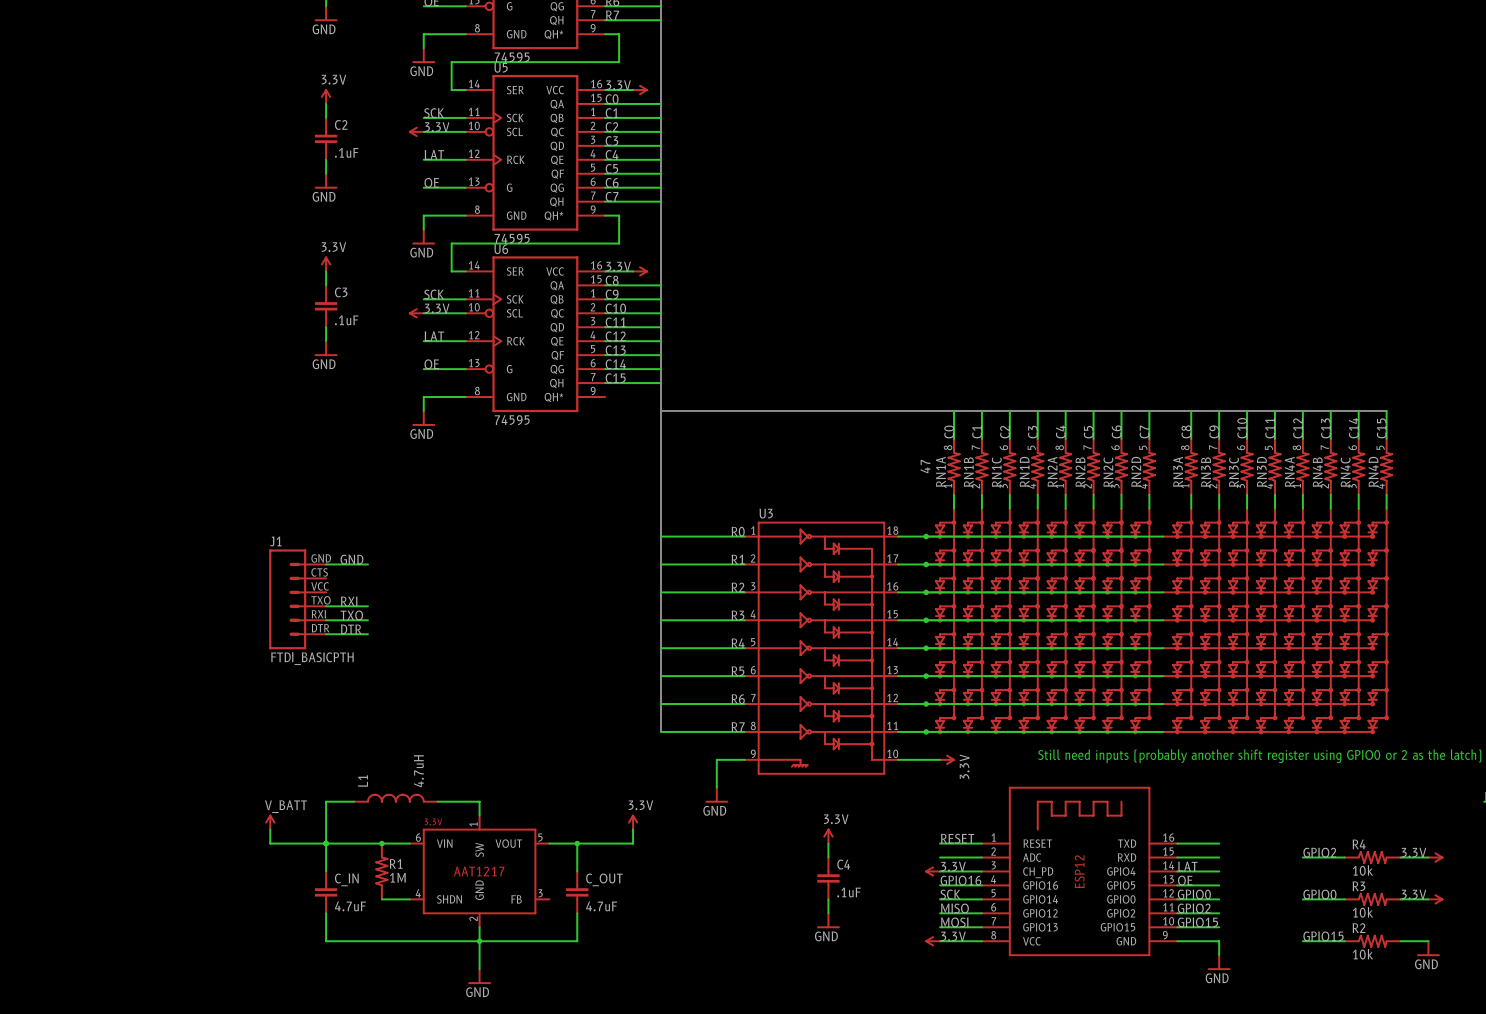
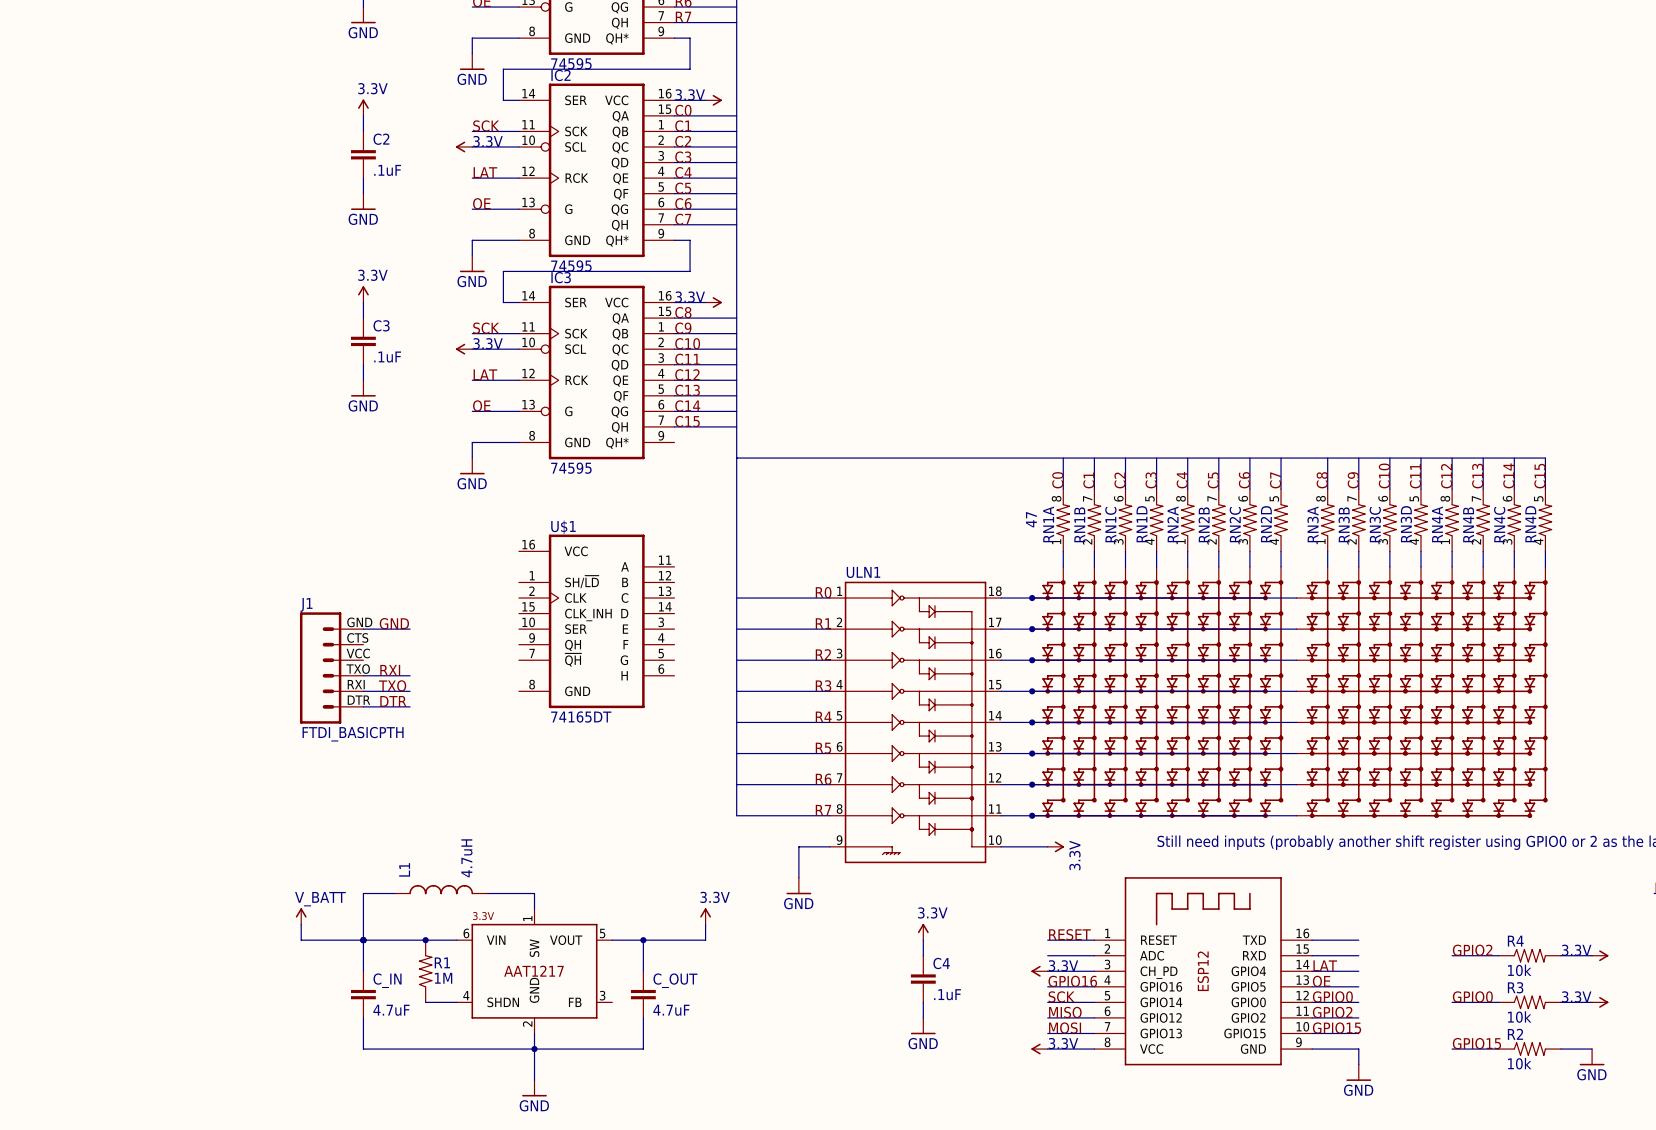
U5 name: U5 (501, 67) -> IC2 (560, 75)
U6 name: U6 (501, 249) -> IC3 (561, 277)
U3 name: U3 (766, 513) -> ULN1 (863, 572)
U$1: none -> 74165DT (596, 621)

